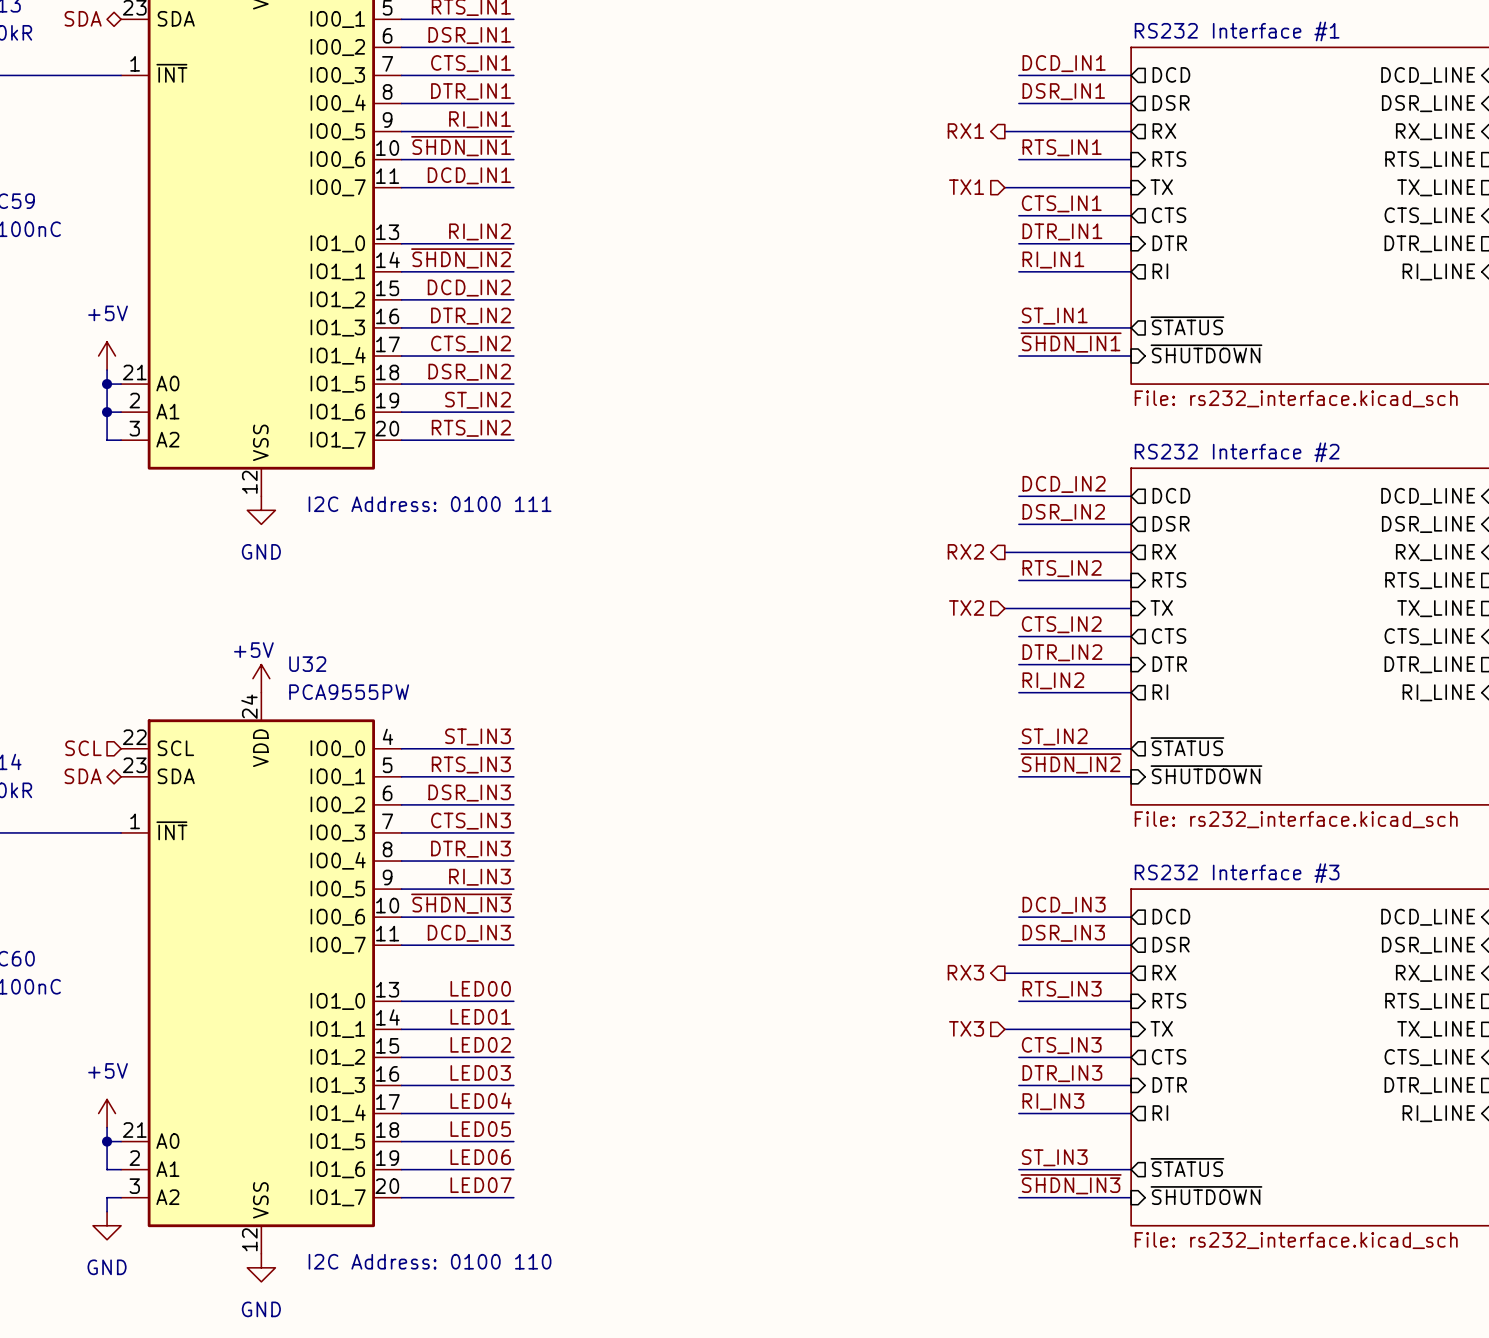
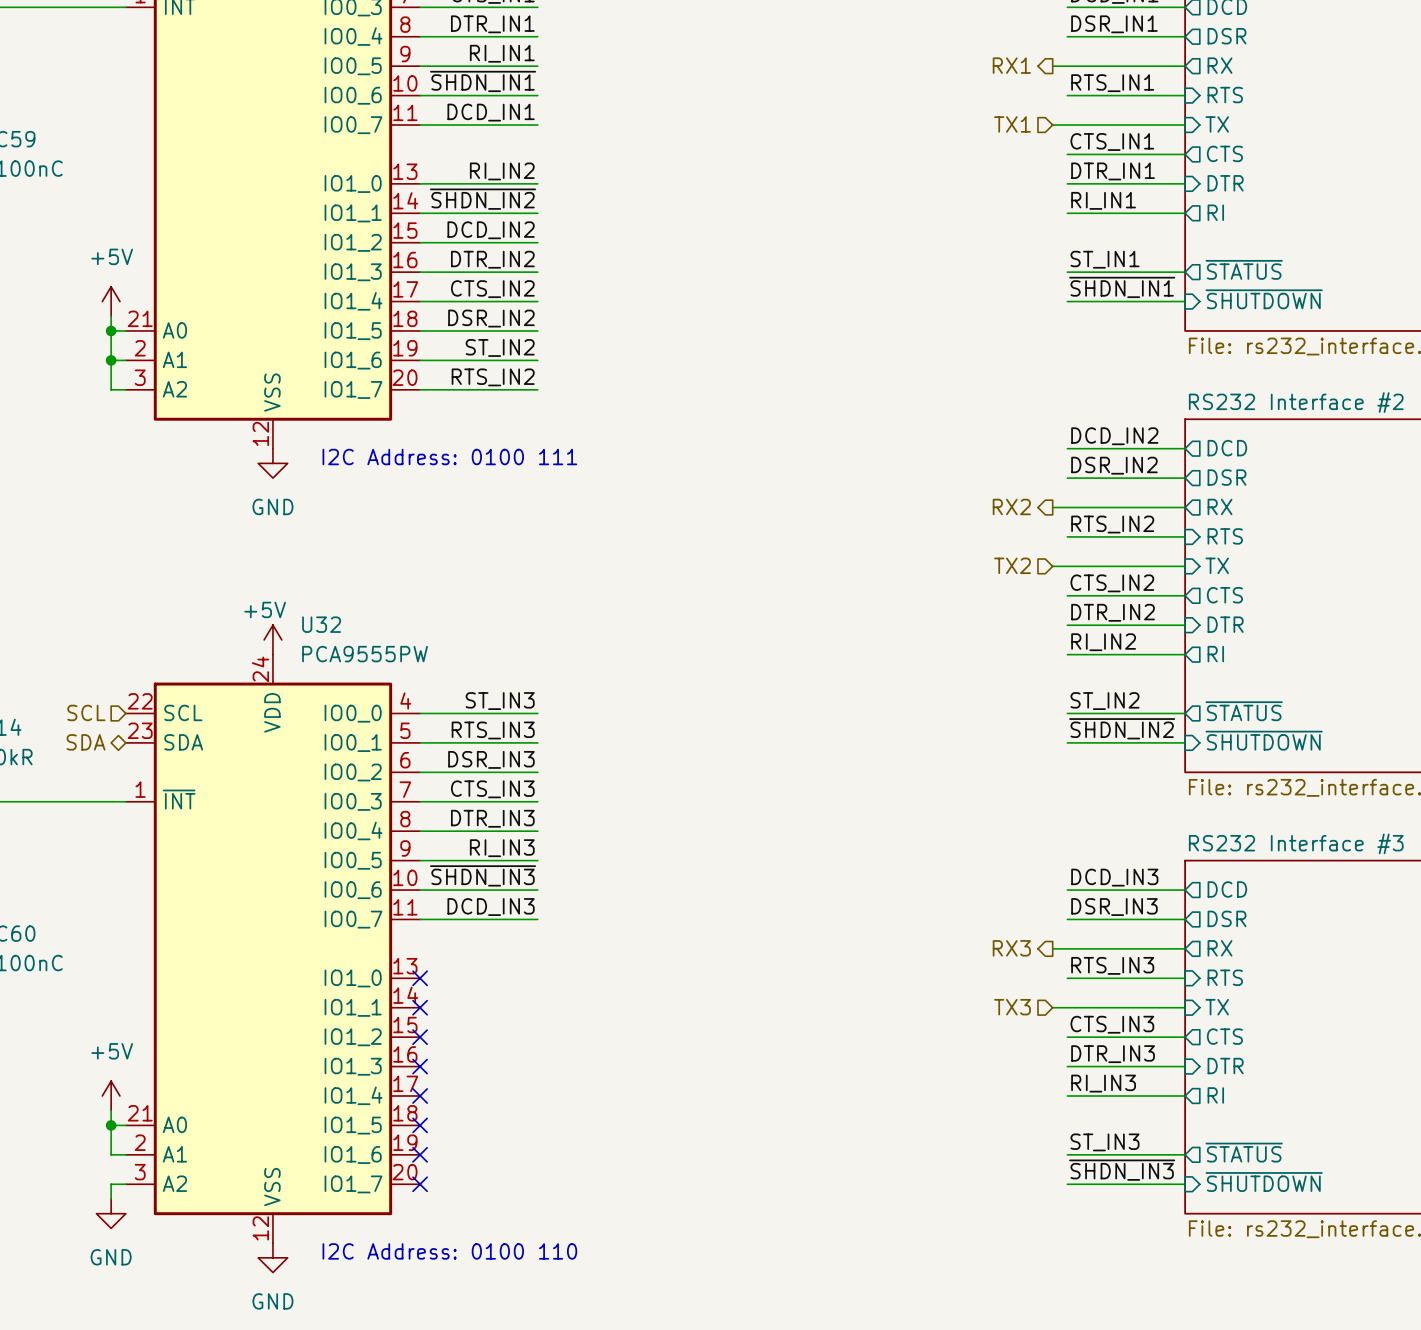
label: LED00 (480, 988) -> none
wire: (401, 1001) (513, 1001) -> none
no-connect mark: none -> (420, 978)
label: LED01 (480, 1016) -> none
wire: (401, 1029) (513, 1029) -> none
no-connect mark: none -> (420, 1007)
label: LED02 (480, 1044) -> none
wire: (401, 1057) (513, 1057) -> none
no-connect mark: none -> (420, 1037)
label: LED03 (480, 1072) -> none
wire: (401, 1085) (513, 1085) -> none
no-connect mark: none -> (420, 1066)
label: LED04 (481, 1100) -> none
wire: (401, 1113) (513, 1113) -> none
no-connect mark: none -> (420, 1095)
label: LED05 (480, 1129) -> none
wire: (401, 1141) (513, 1141) -> none
no-connect mark: none -> (420, 1125)
label: LED06 (480, 1157) -> none
wire: (401, 1169) (513, 1169) -> none
no-connect mark: none -> (420, 1154)
label: LED07 (481, 1185) -> none
wire: (401, 1197) (513, 1197) -> none
no-connect mark: none -> (420, 1184)

